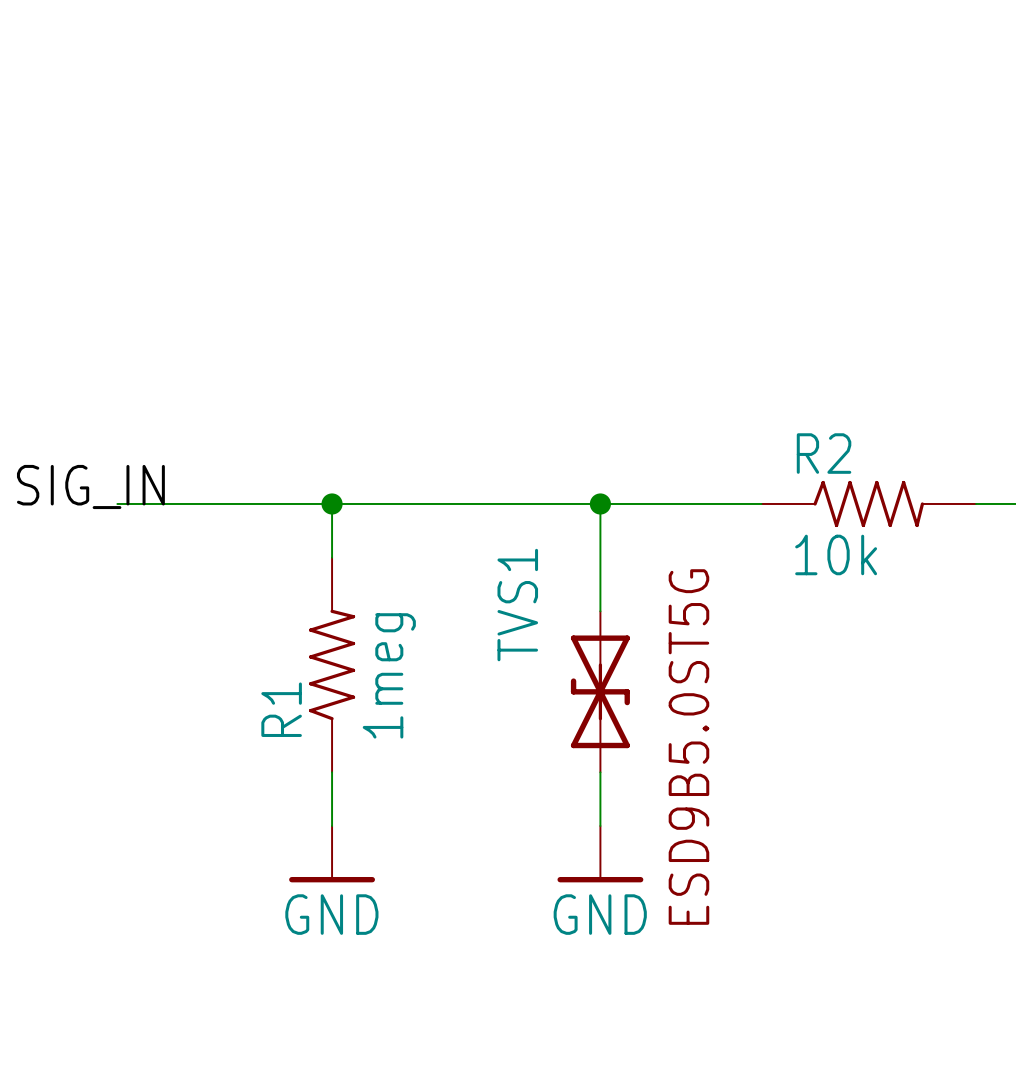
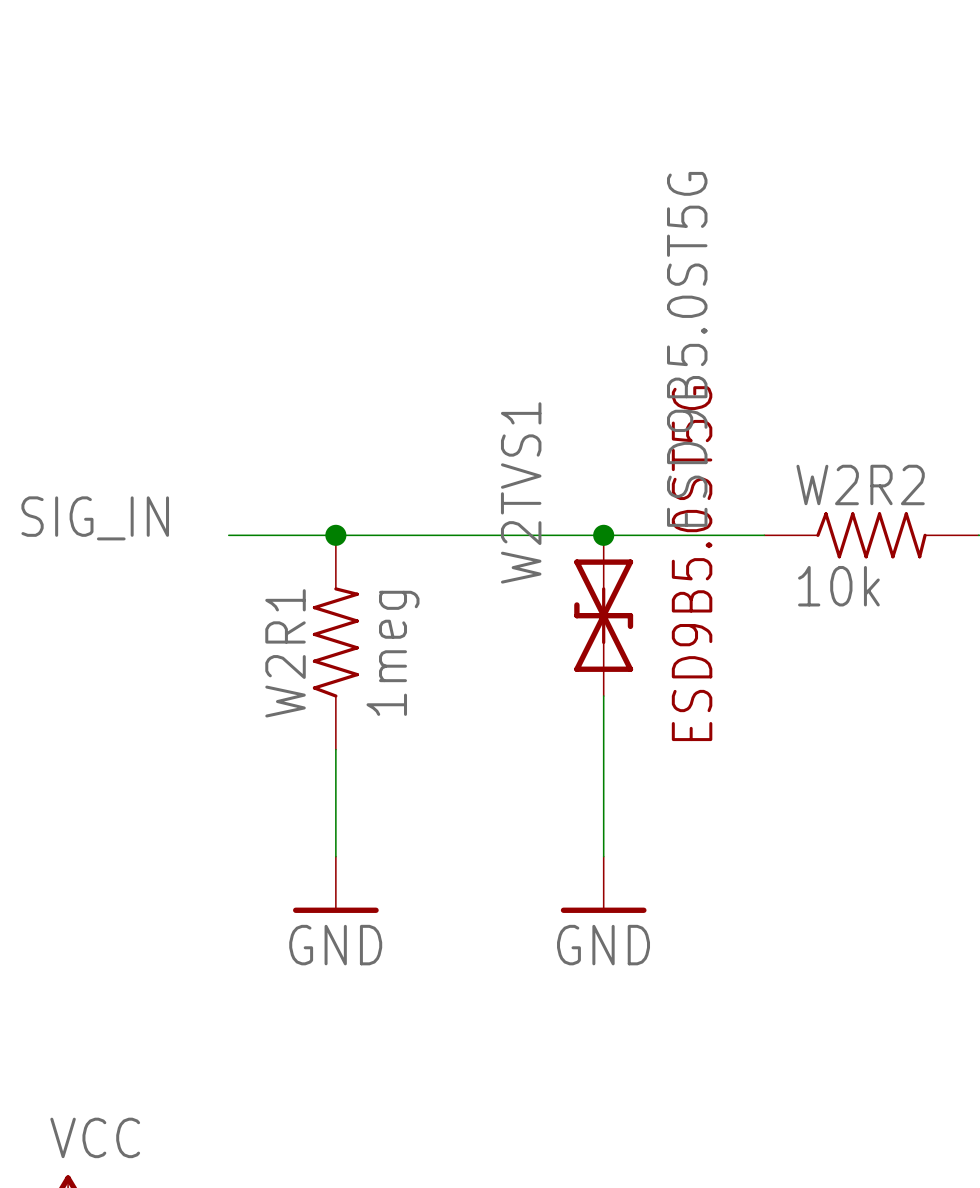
R2 name: R2 (824, 453) -> W2R2 (860, 484)
wire: (117, 503) (224, 503) -> none
W2TVS1: none -> ESD9B5.0ST5G (603, 615)
W2R1: none -> 1meg (335, 642)
R1: 1meg (332, 664) -> none
TVS1: (600, 691) -> none

